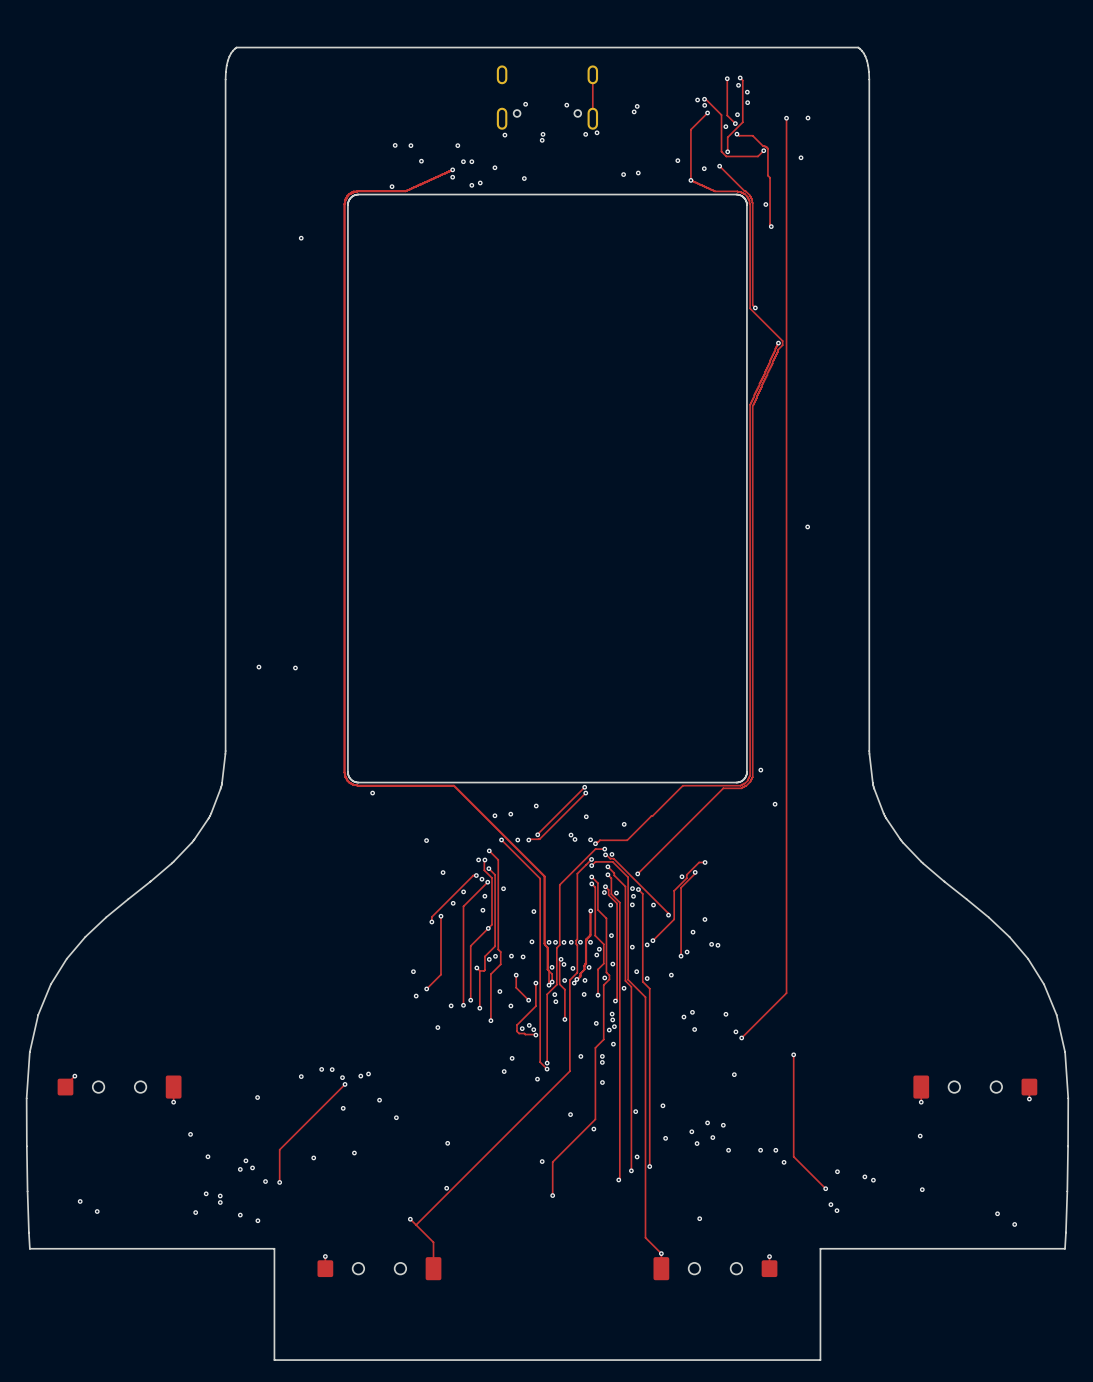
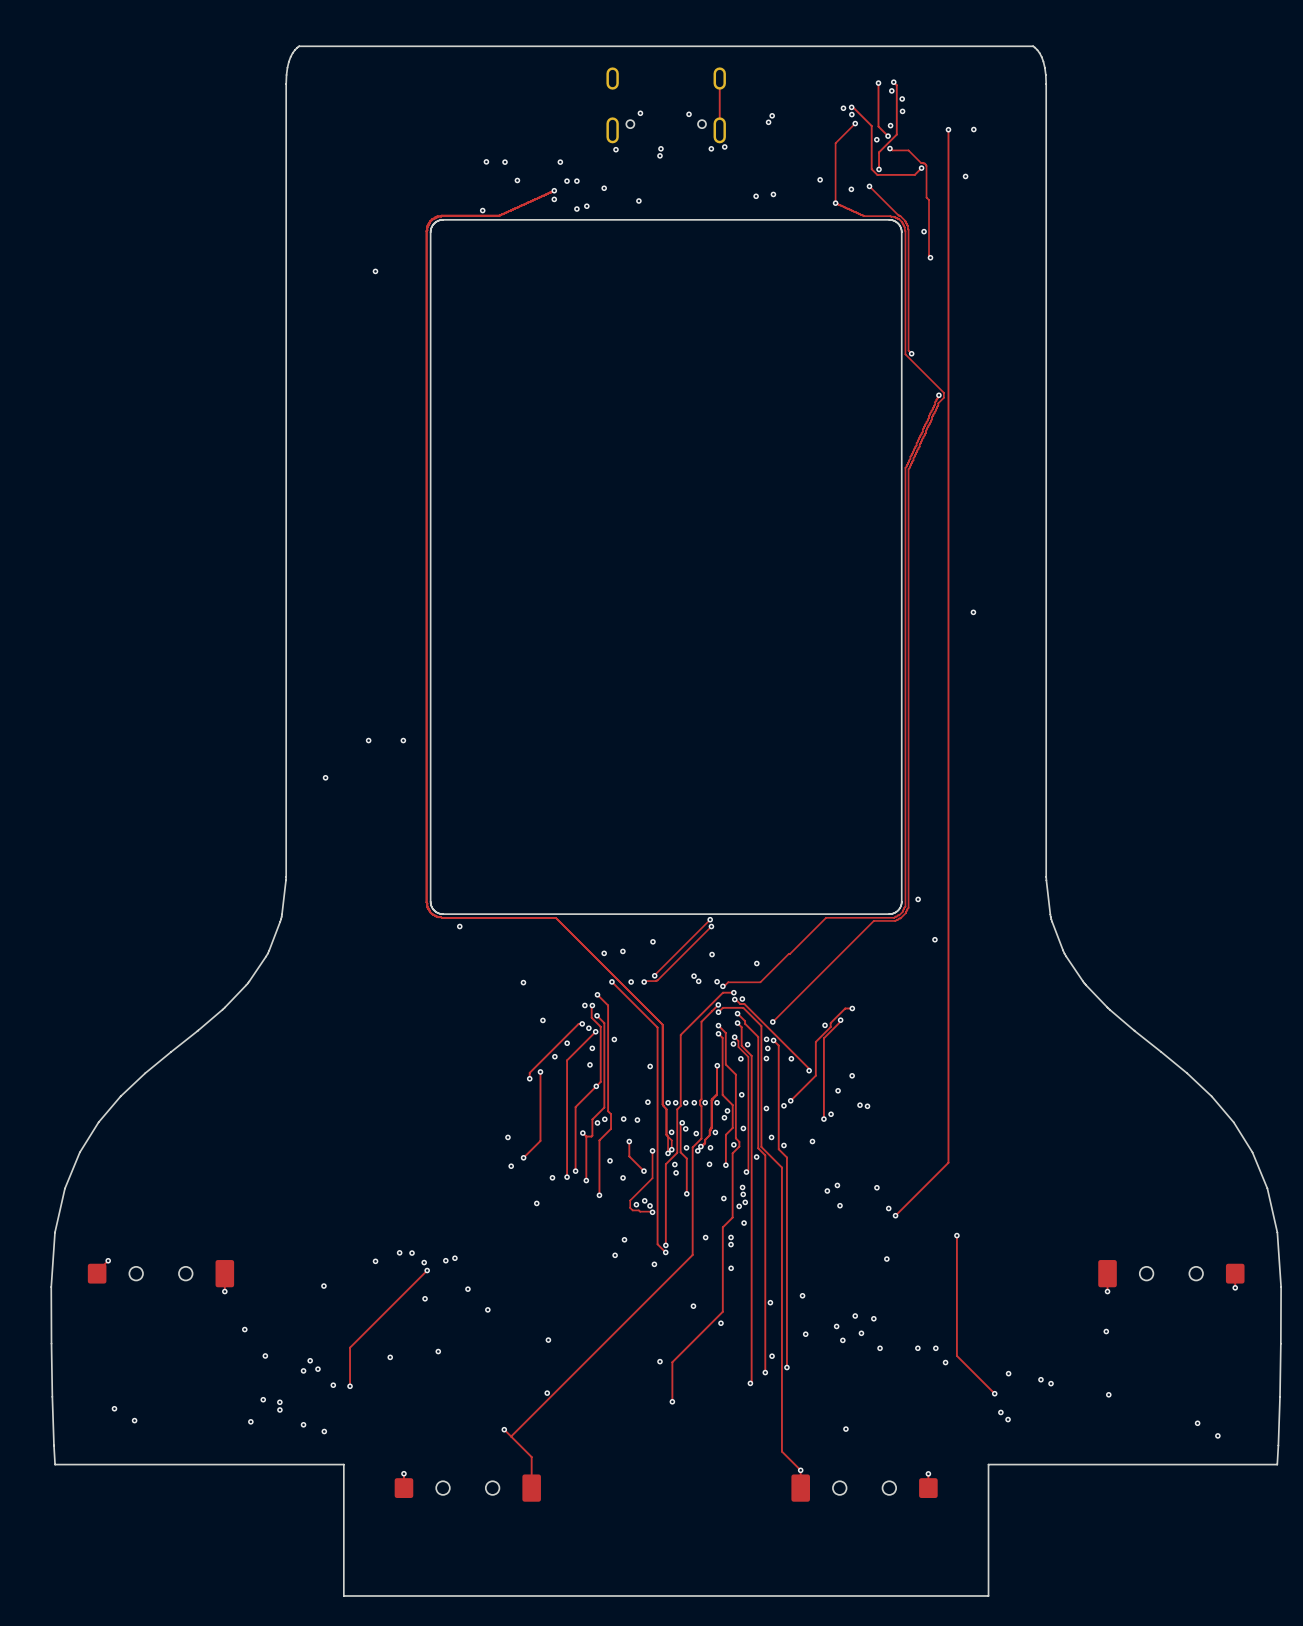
via: none -> (368, 740)
via: none -> (403, 740)
via: (295, 667) -> none

